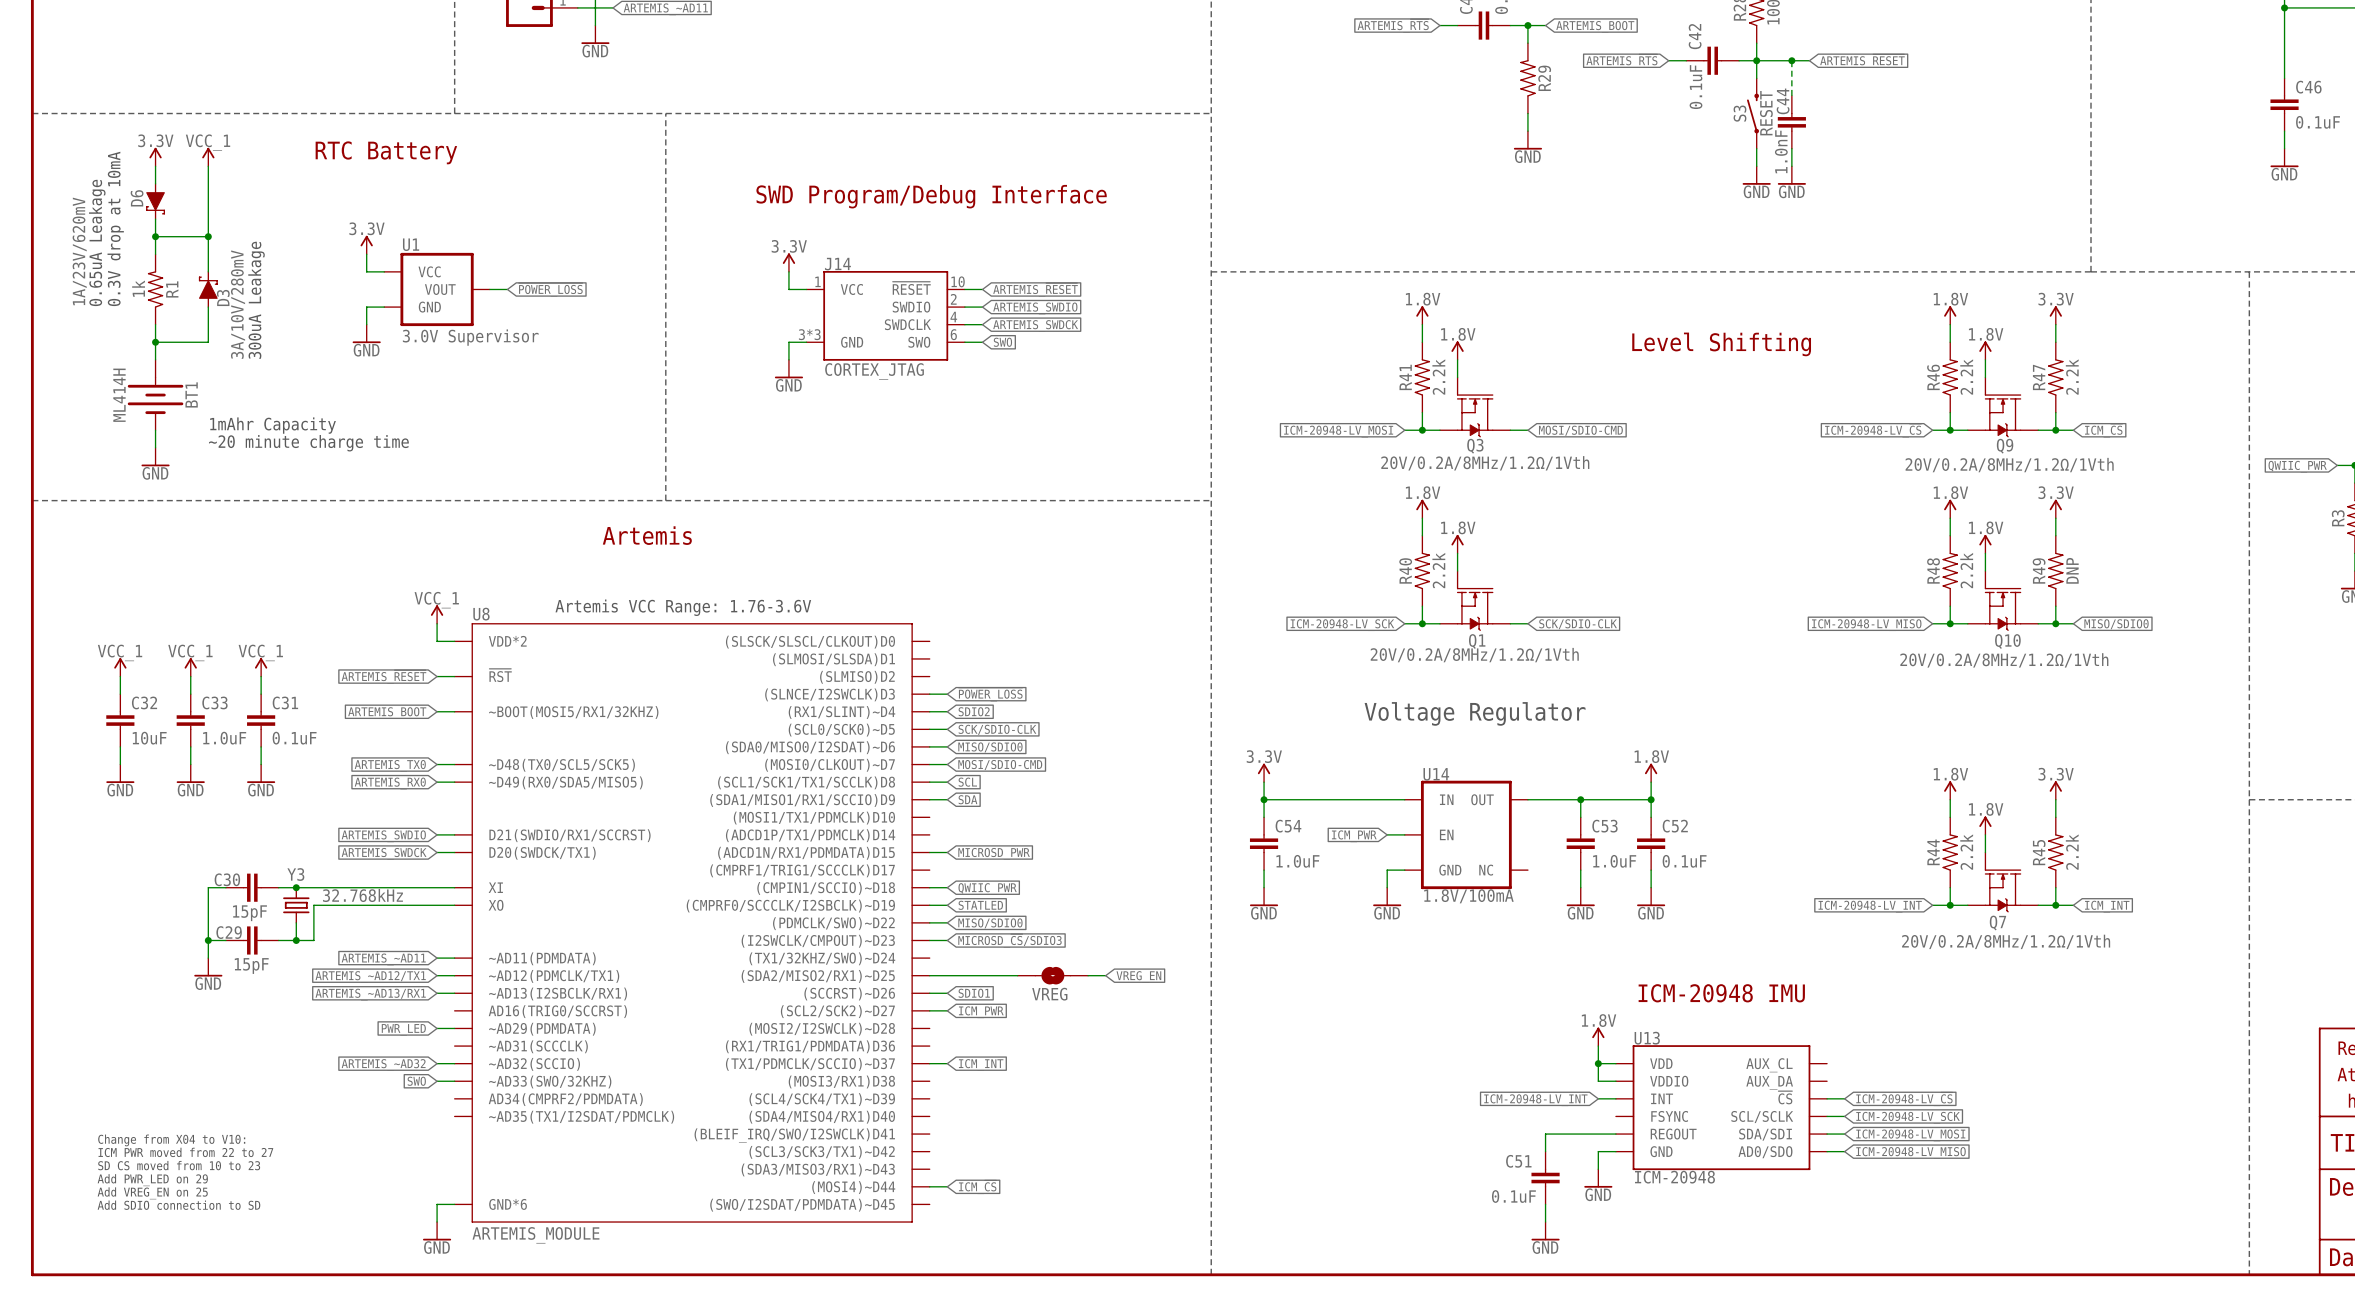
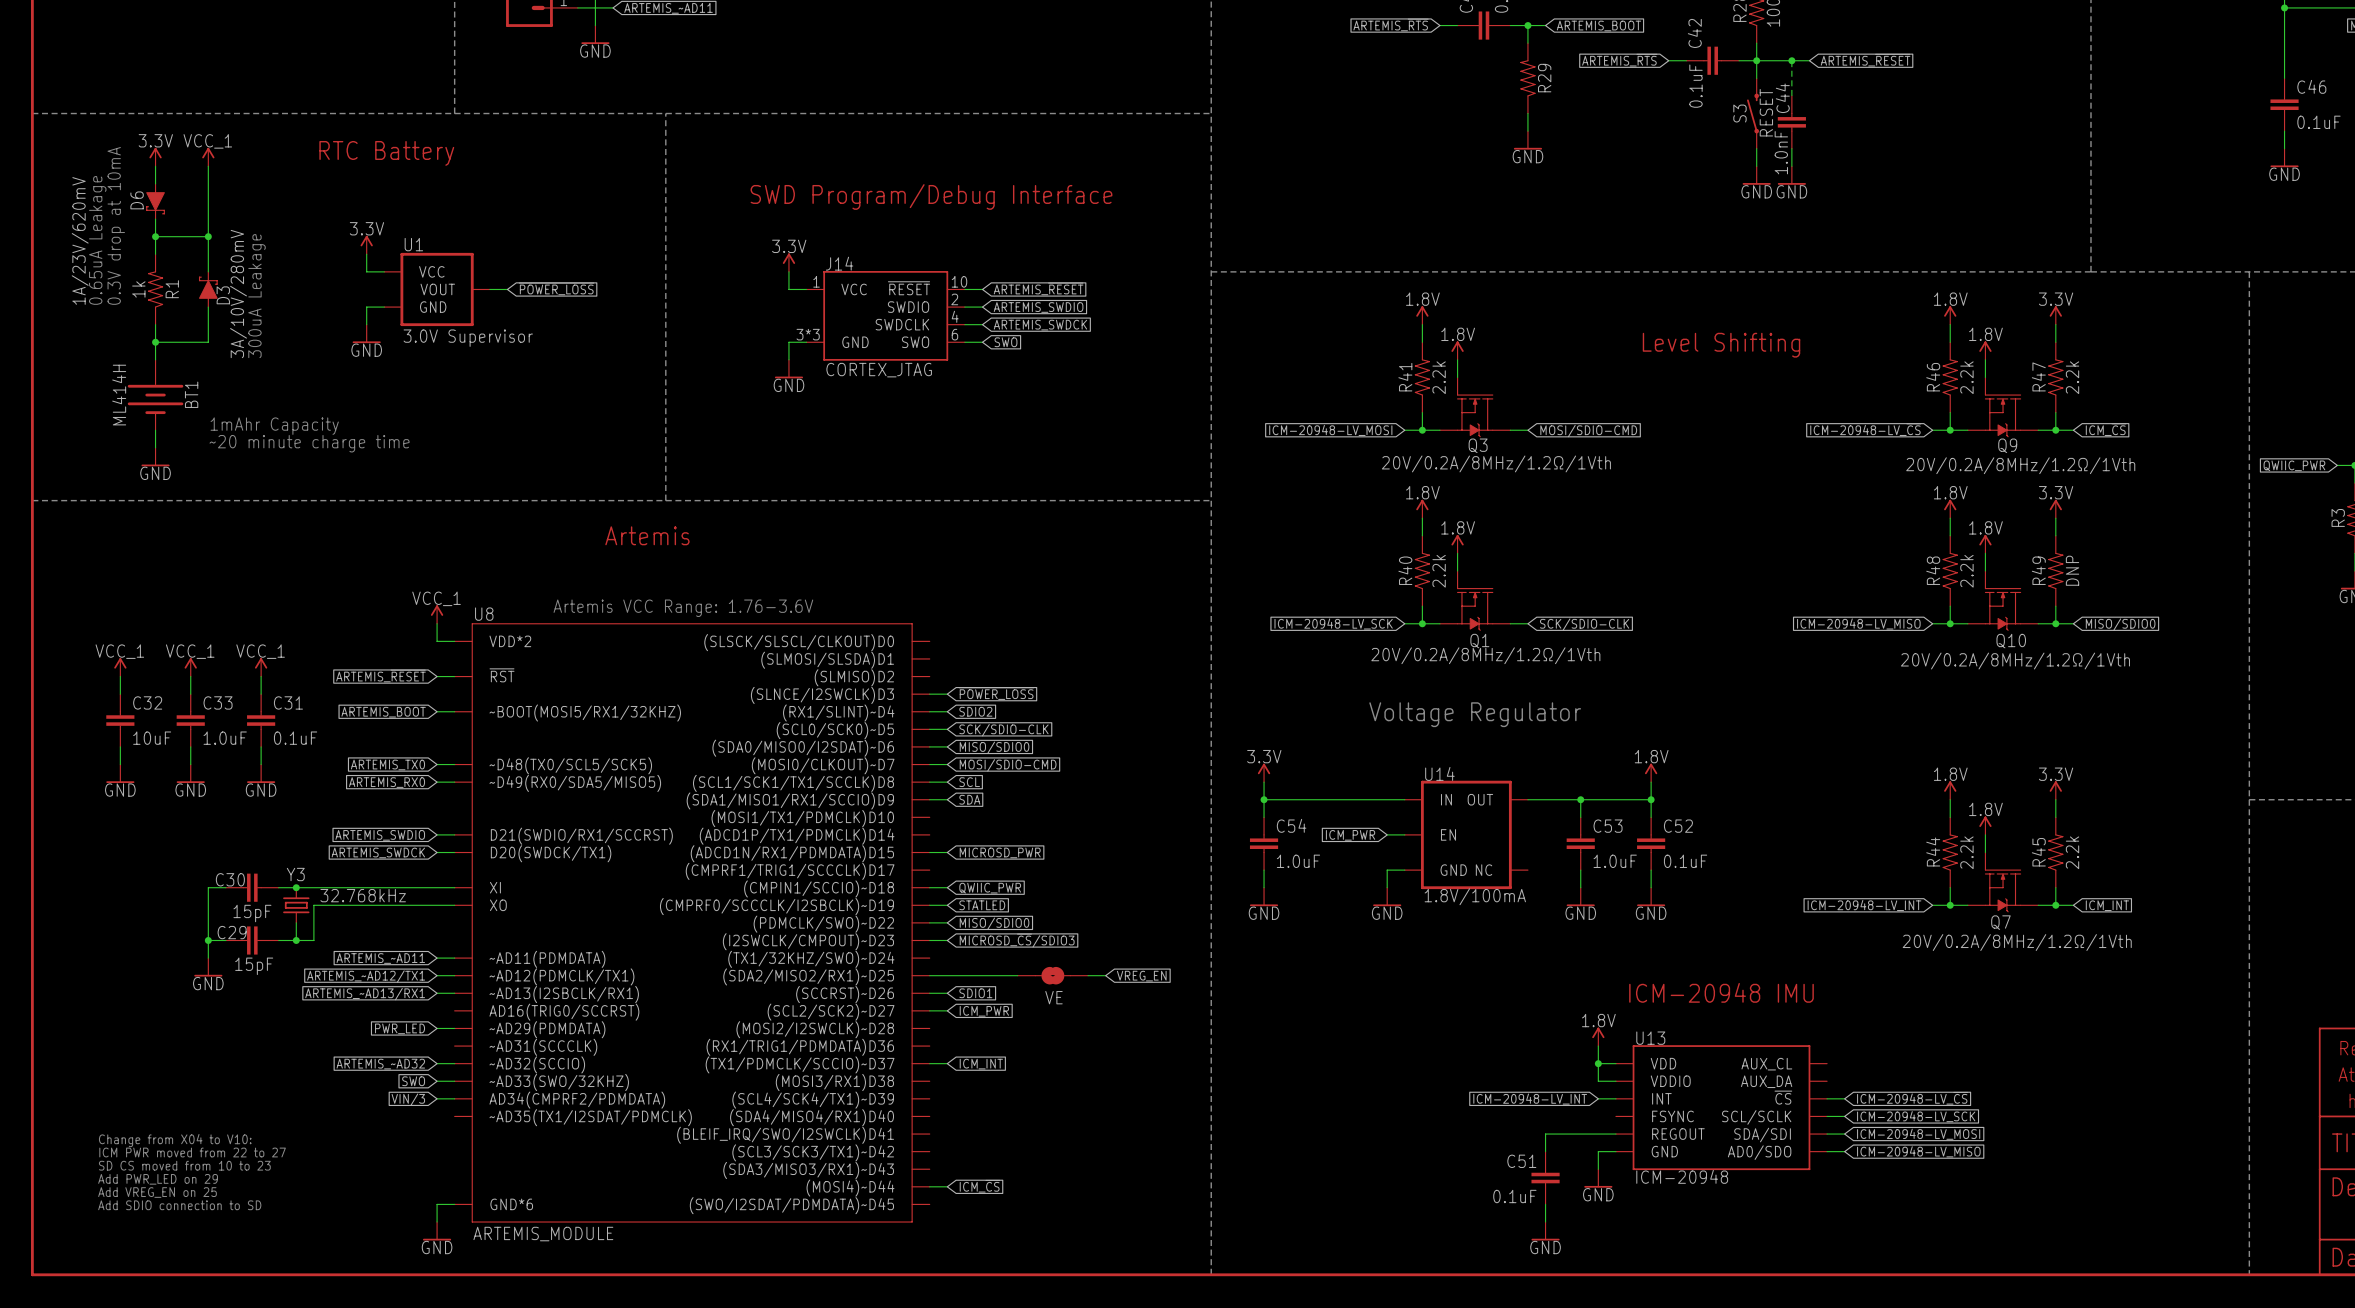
VREG name: VREG (1049, 994) -> VE (1053, 997)
wire: none -> (437, 1098) (454, 1098)
global label: none -> VIN/3 (408, 1099)

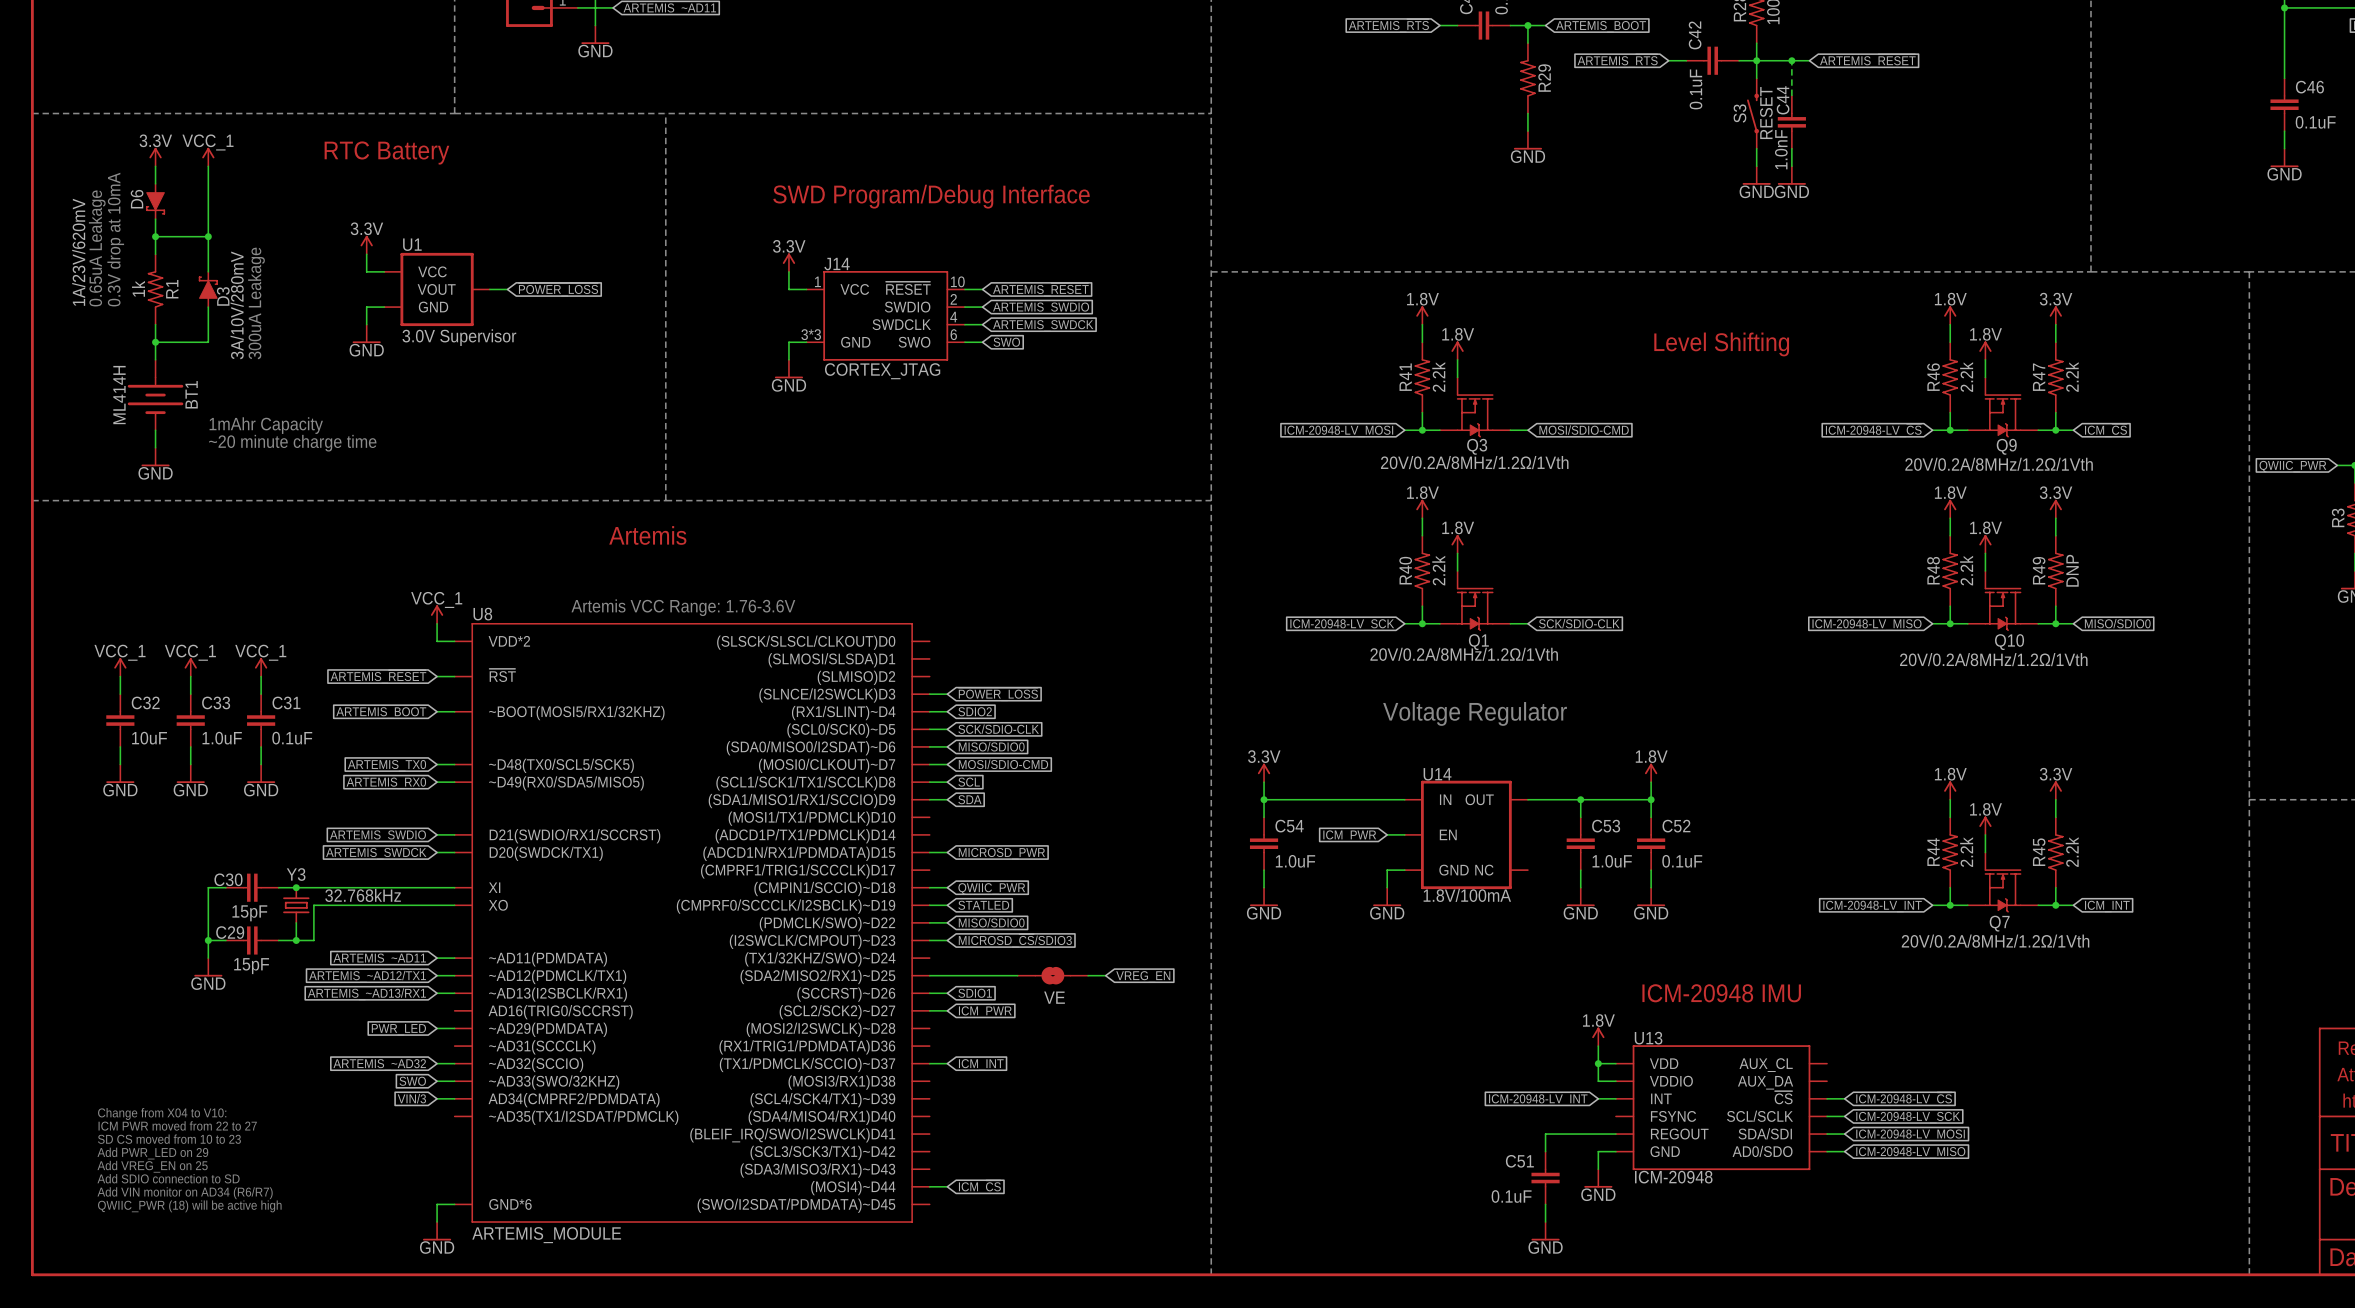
text: none -> Change from X04 to V10: (162, 1114)
text: none -> ICM PWR moved from 22 to 27 (177, 1125)
text: Change from X04 to V10: (175, 1140) -> SD CS moved from 10 to 23 (169, 1139)
text: ICM PWR moved from 22 to 27 (192, 1152) -> Add PWR_LED on 29 (152, 1153)
text: SD CS moved from 10 to 23 (184, 1165) -> Add VREG_EN on 25 (152, 1166)
text: Add PWR_LED on 29 (158, 1179) -> Add SDIO connection to SD (168, 1178)
text: Add VREG_EN on 25 (157, 1192) -> Add VIN monitor on AD34 (R6/R7) (185, 1193)
text: Add SDIO connection to SD (179, 1205) -> QWIIC_PWR (18) will be active high (189, 1206)

